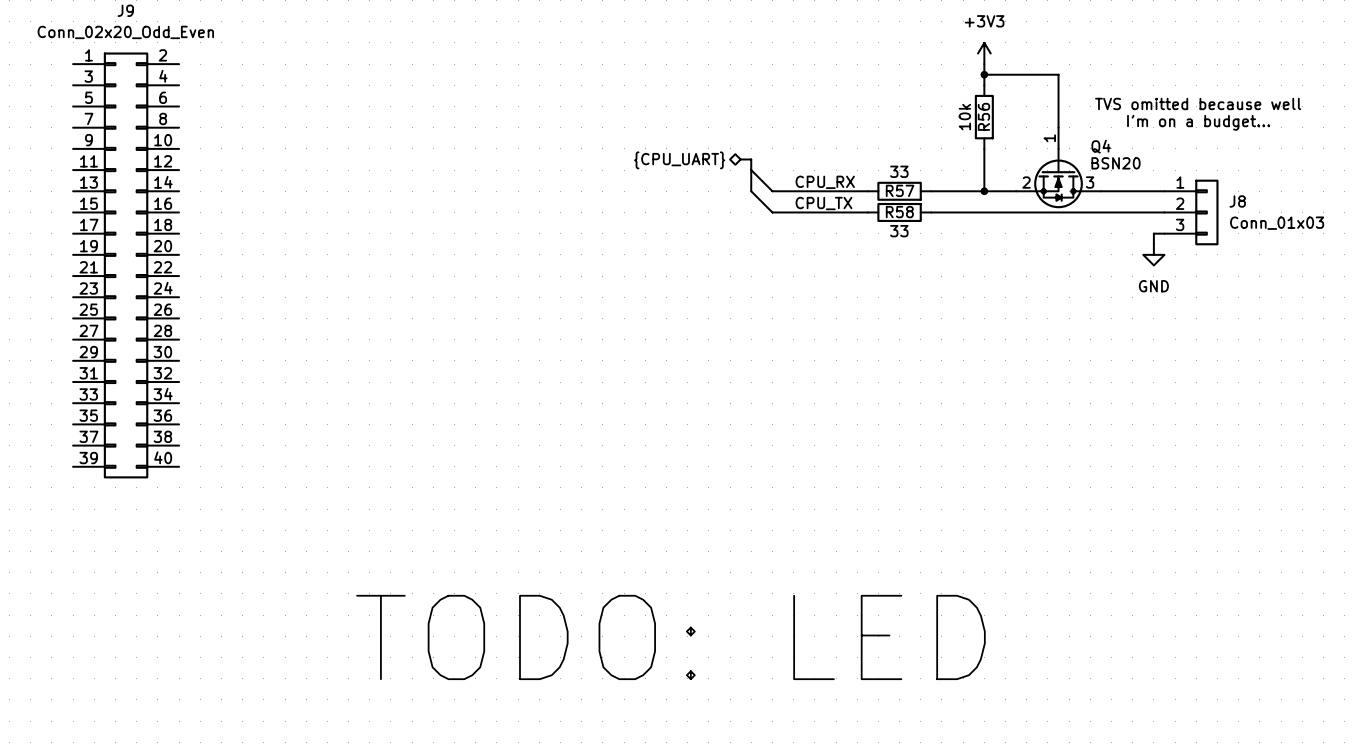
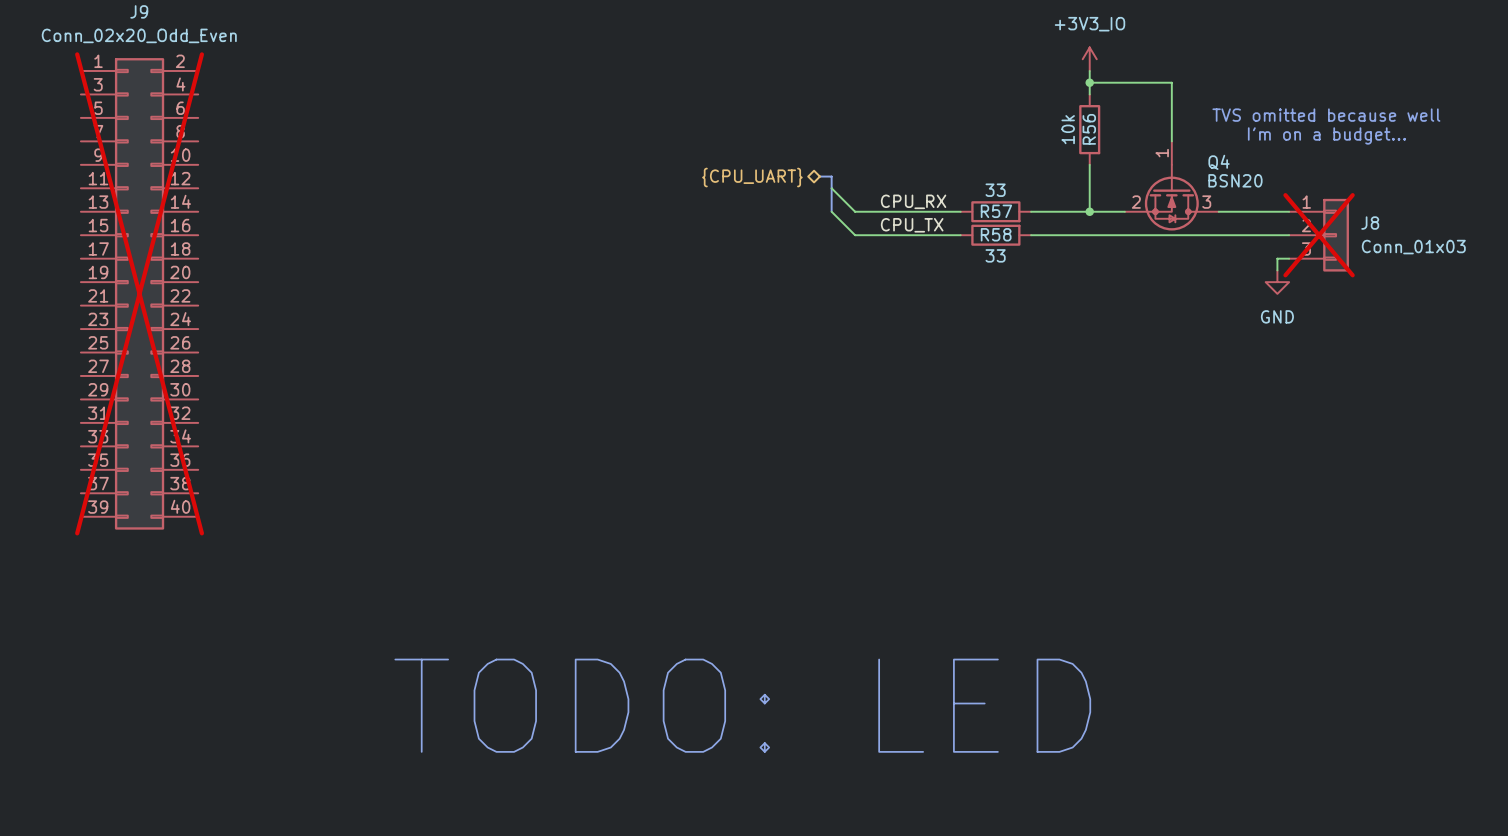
power symbol: +3V3 (984, 53) -> +3V3_IO (1089, 59)
J8 do-not-place cross: none -> (1319, 235)
J9 do-not-place cross: none -> (139, 293)

